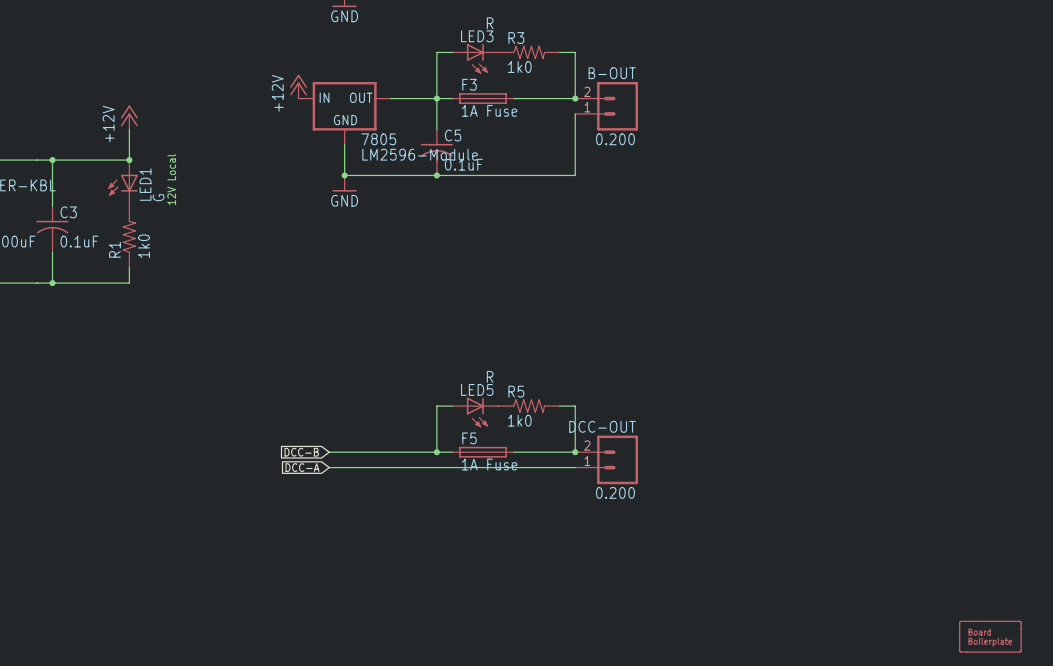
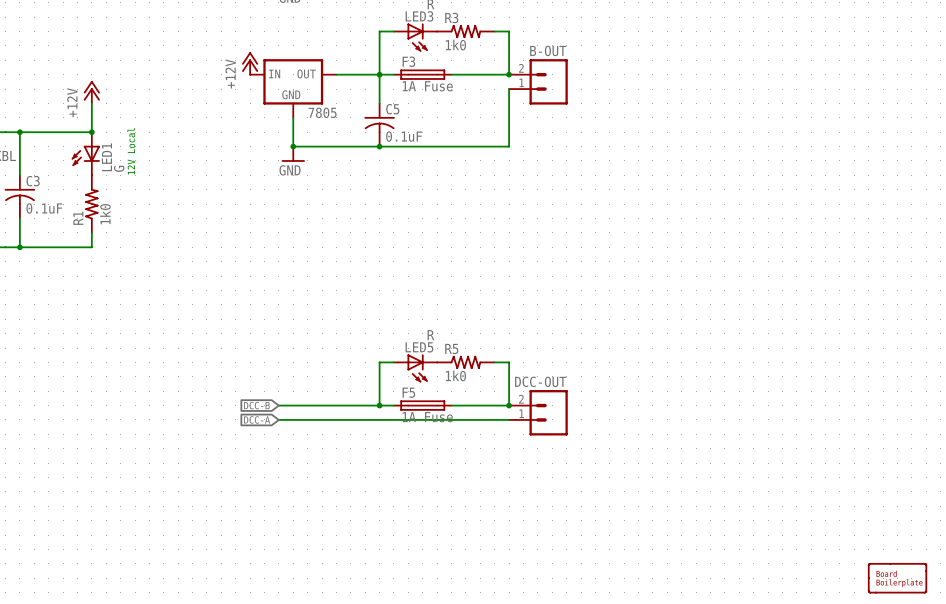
B-OUT value: 0.200 (615, 139) -> none
7805 value: LM2596-Module (420, 154) -> none
DCC-OUT value: 0.200 (615, 492) -> none

